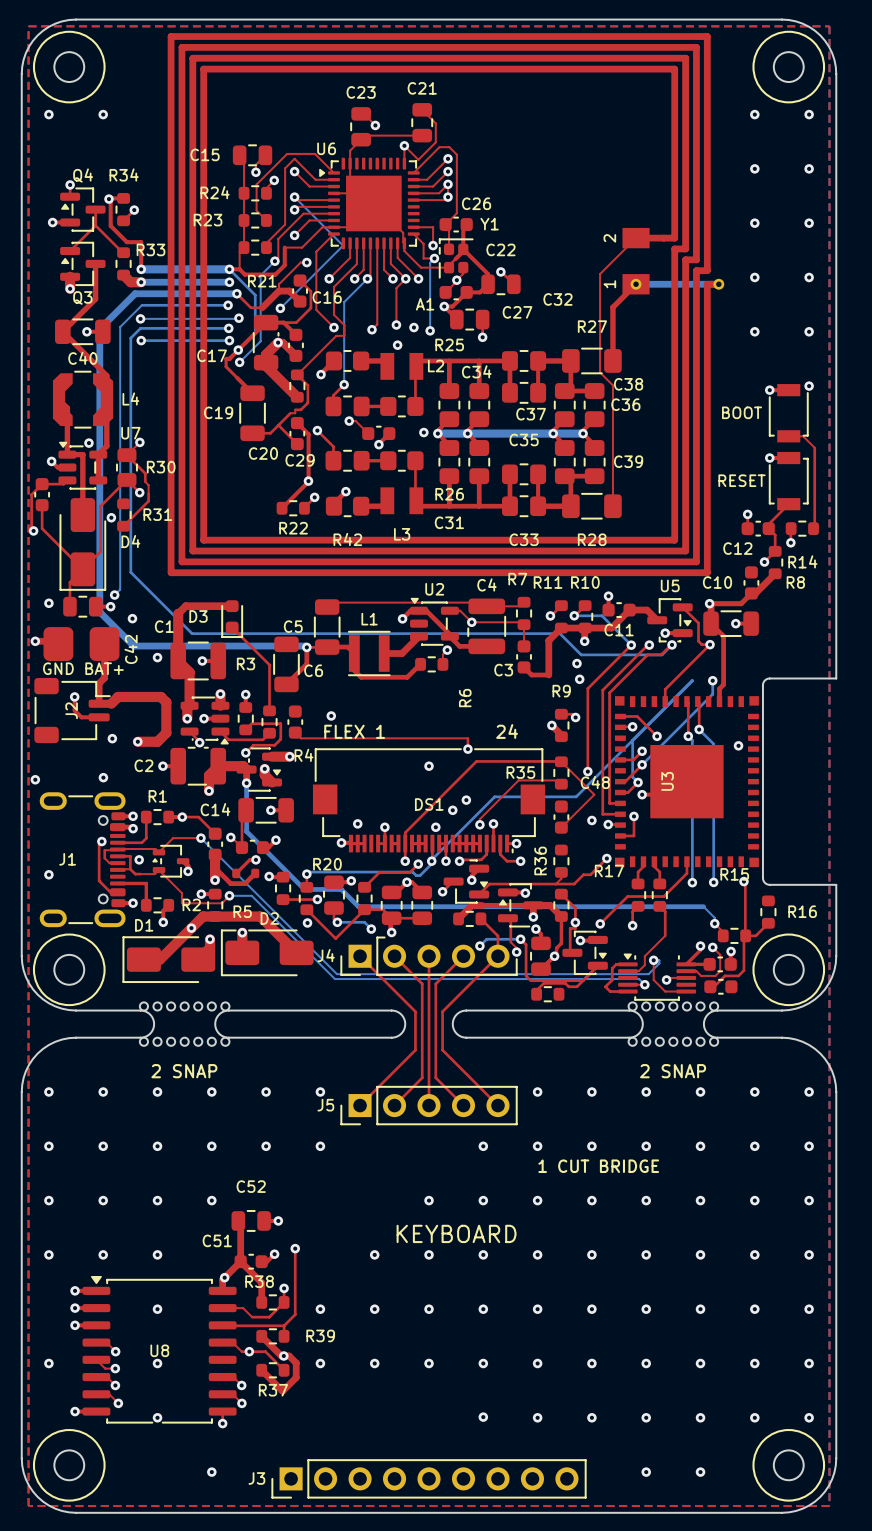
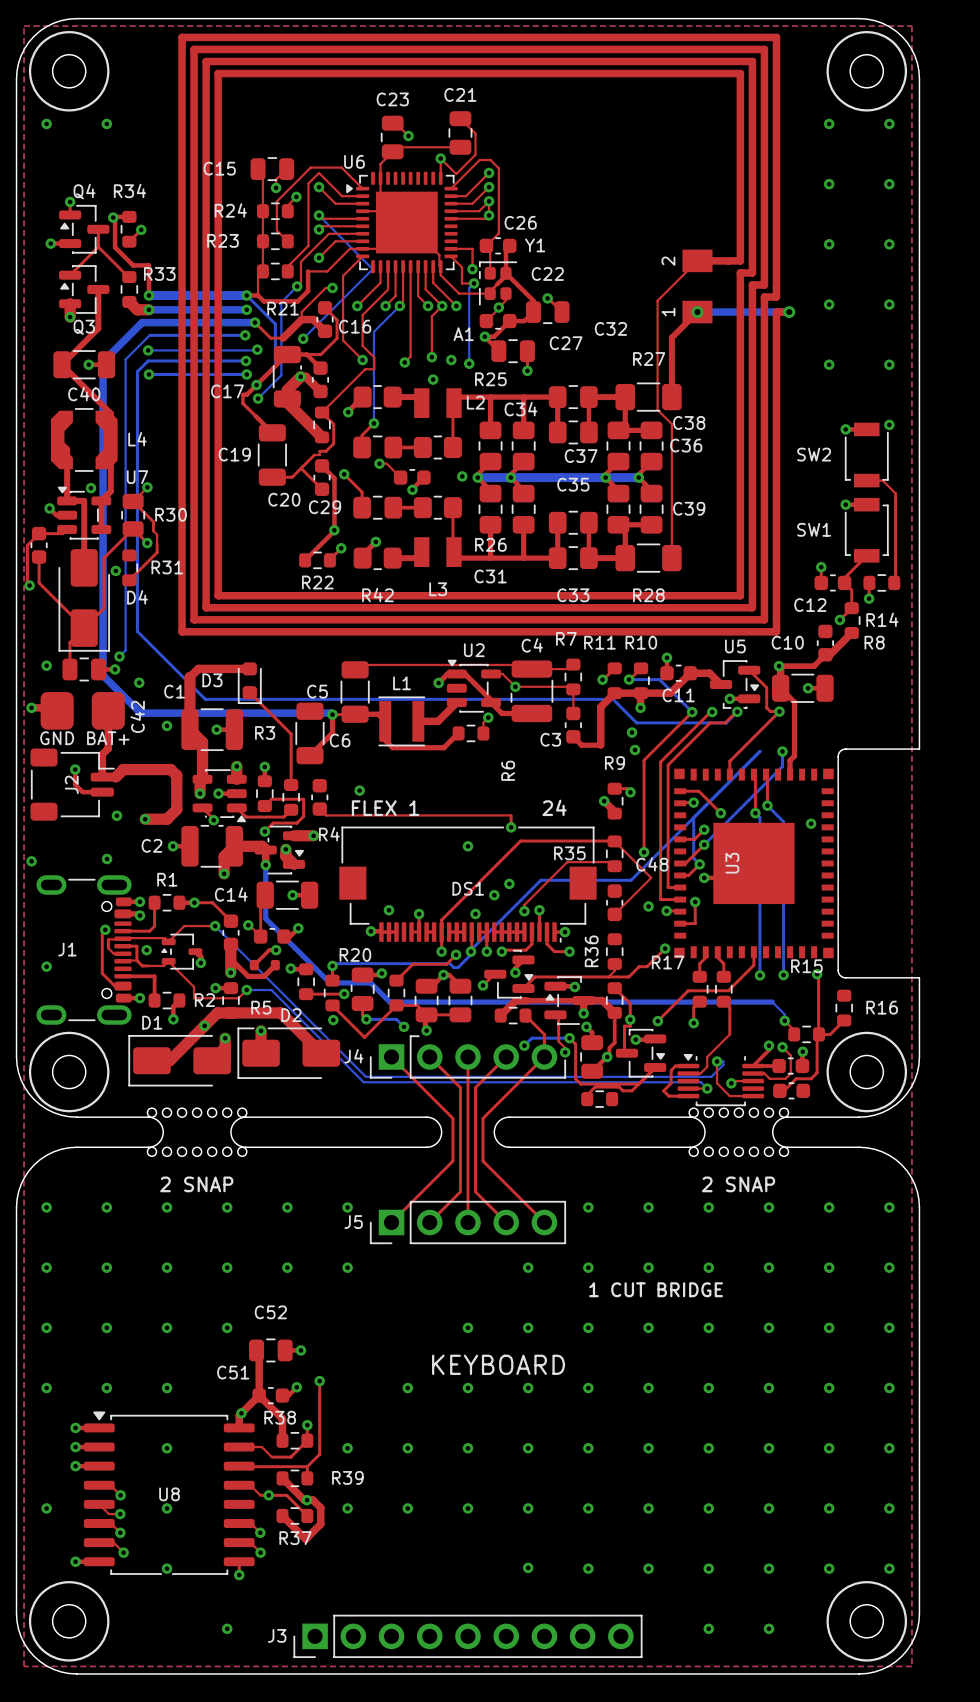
SW2 name: none -> SW2 (814, 454)
text: BOOT (742, 412) -> none
SW1 name: none -> SW1 (814, 529)
text: RESET (742, 480) -> none

